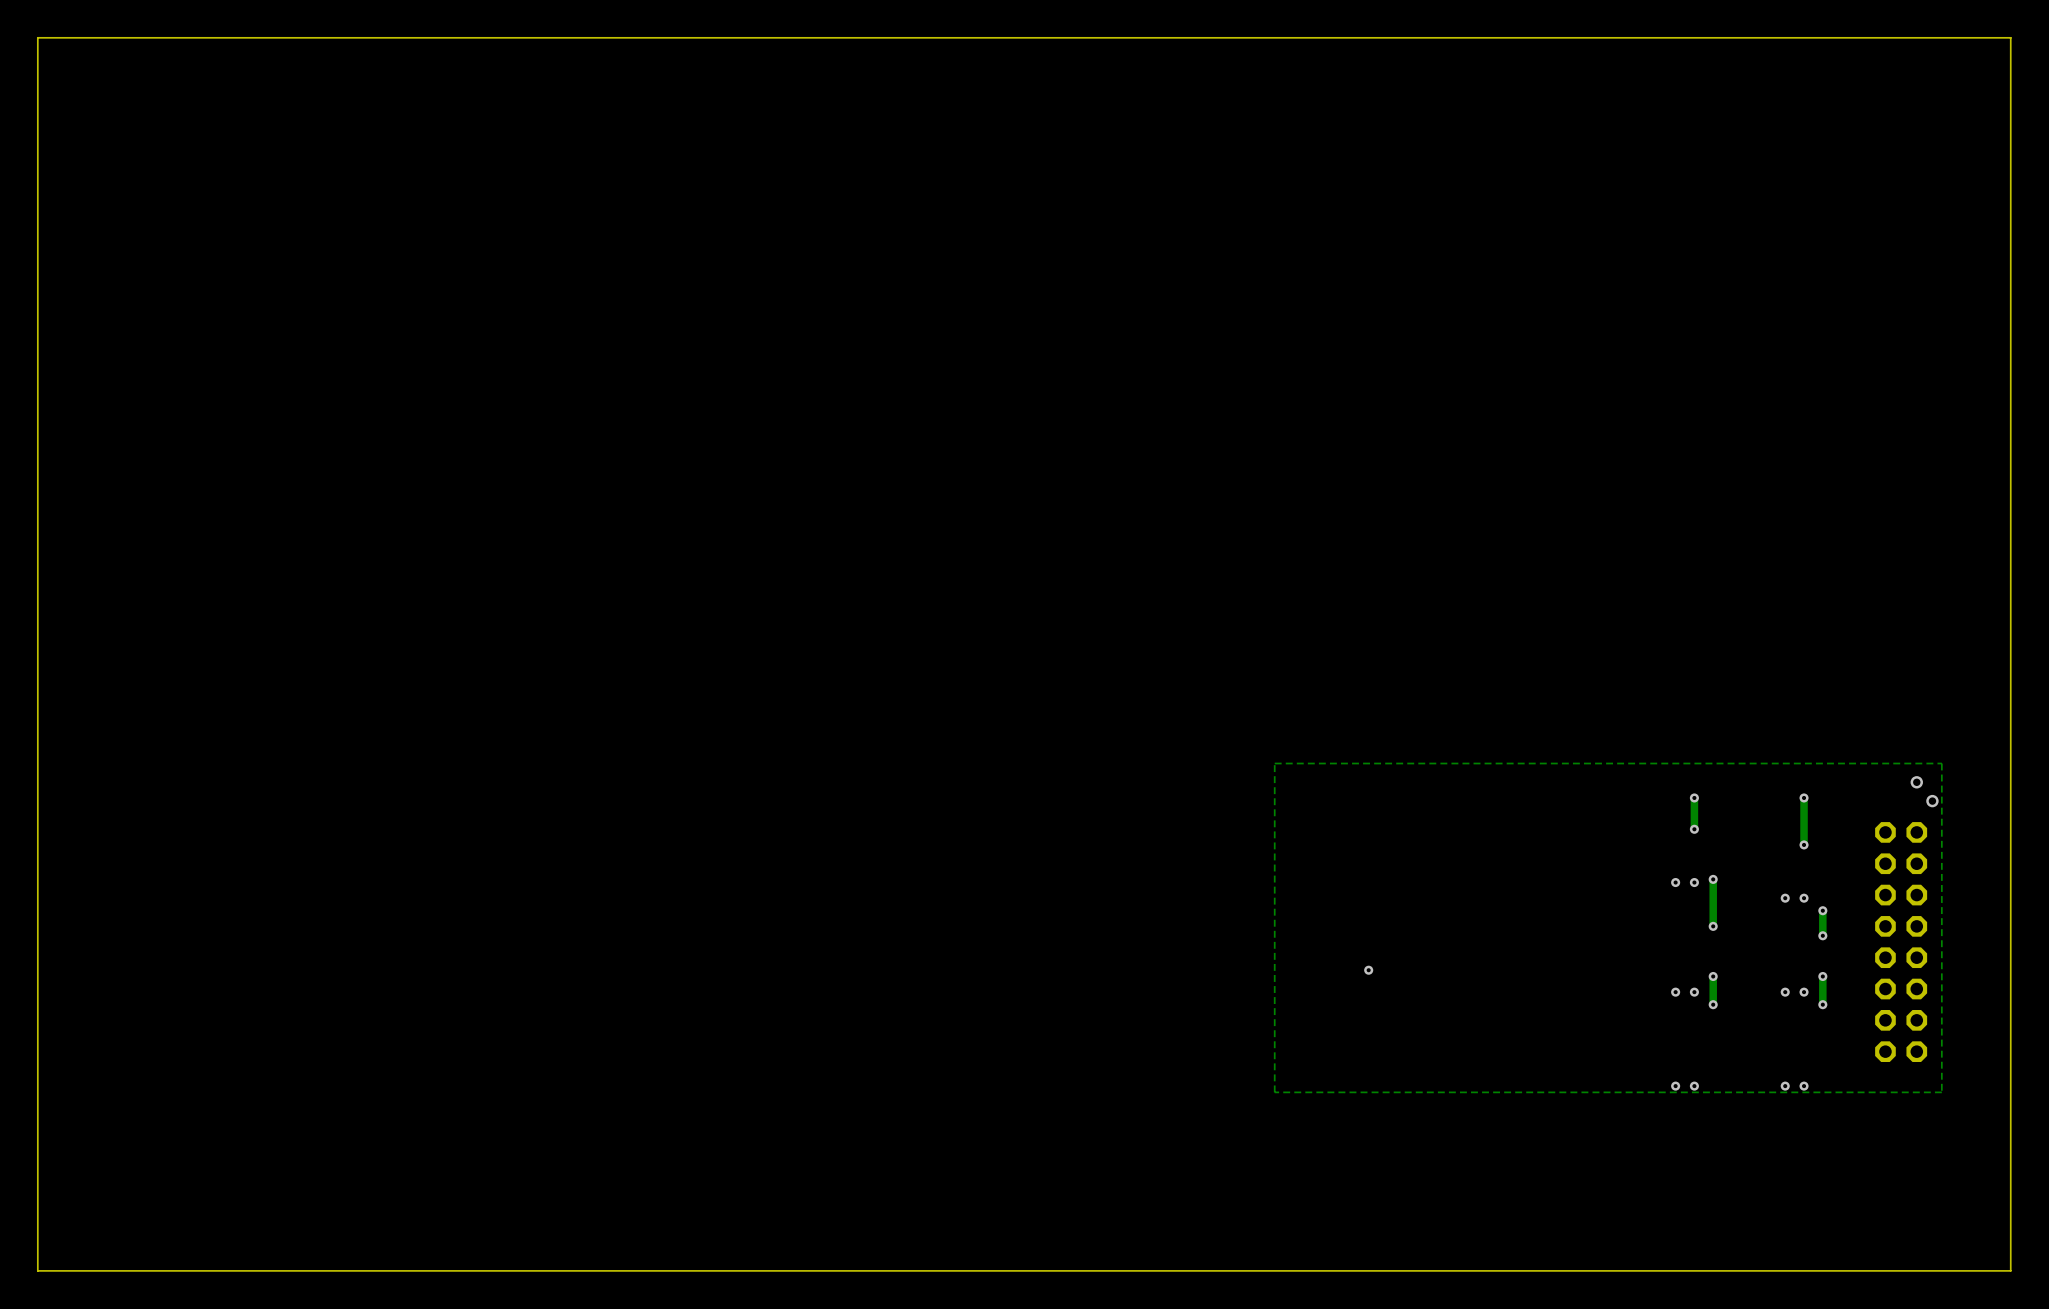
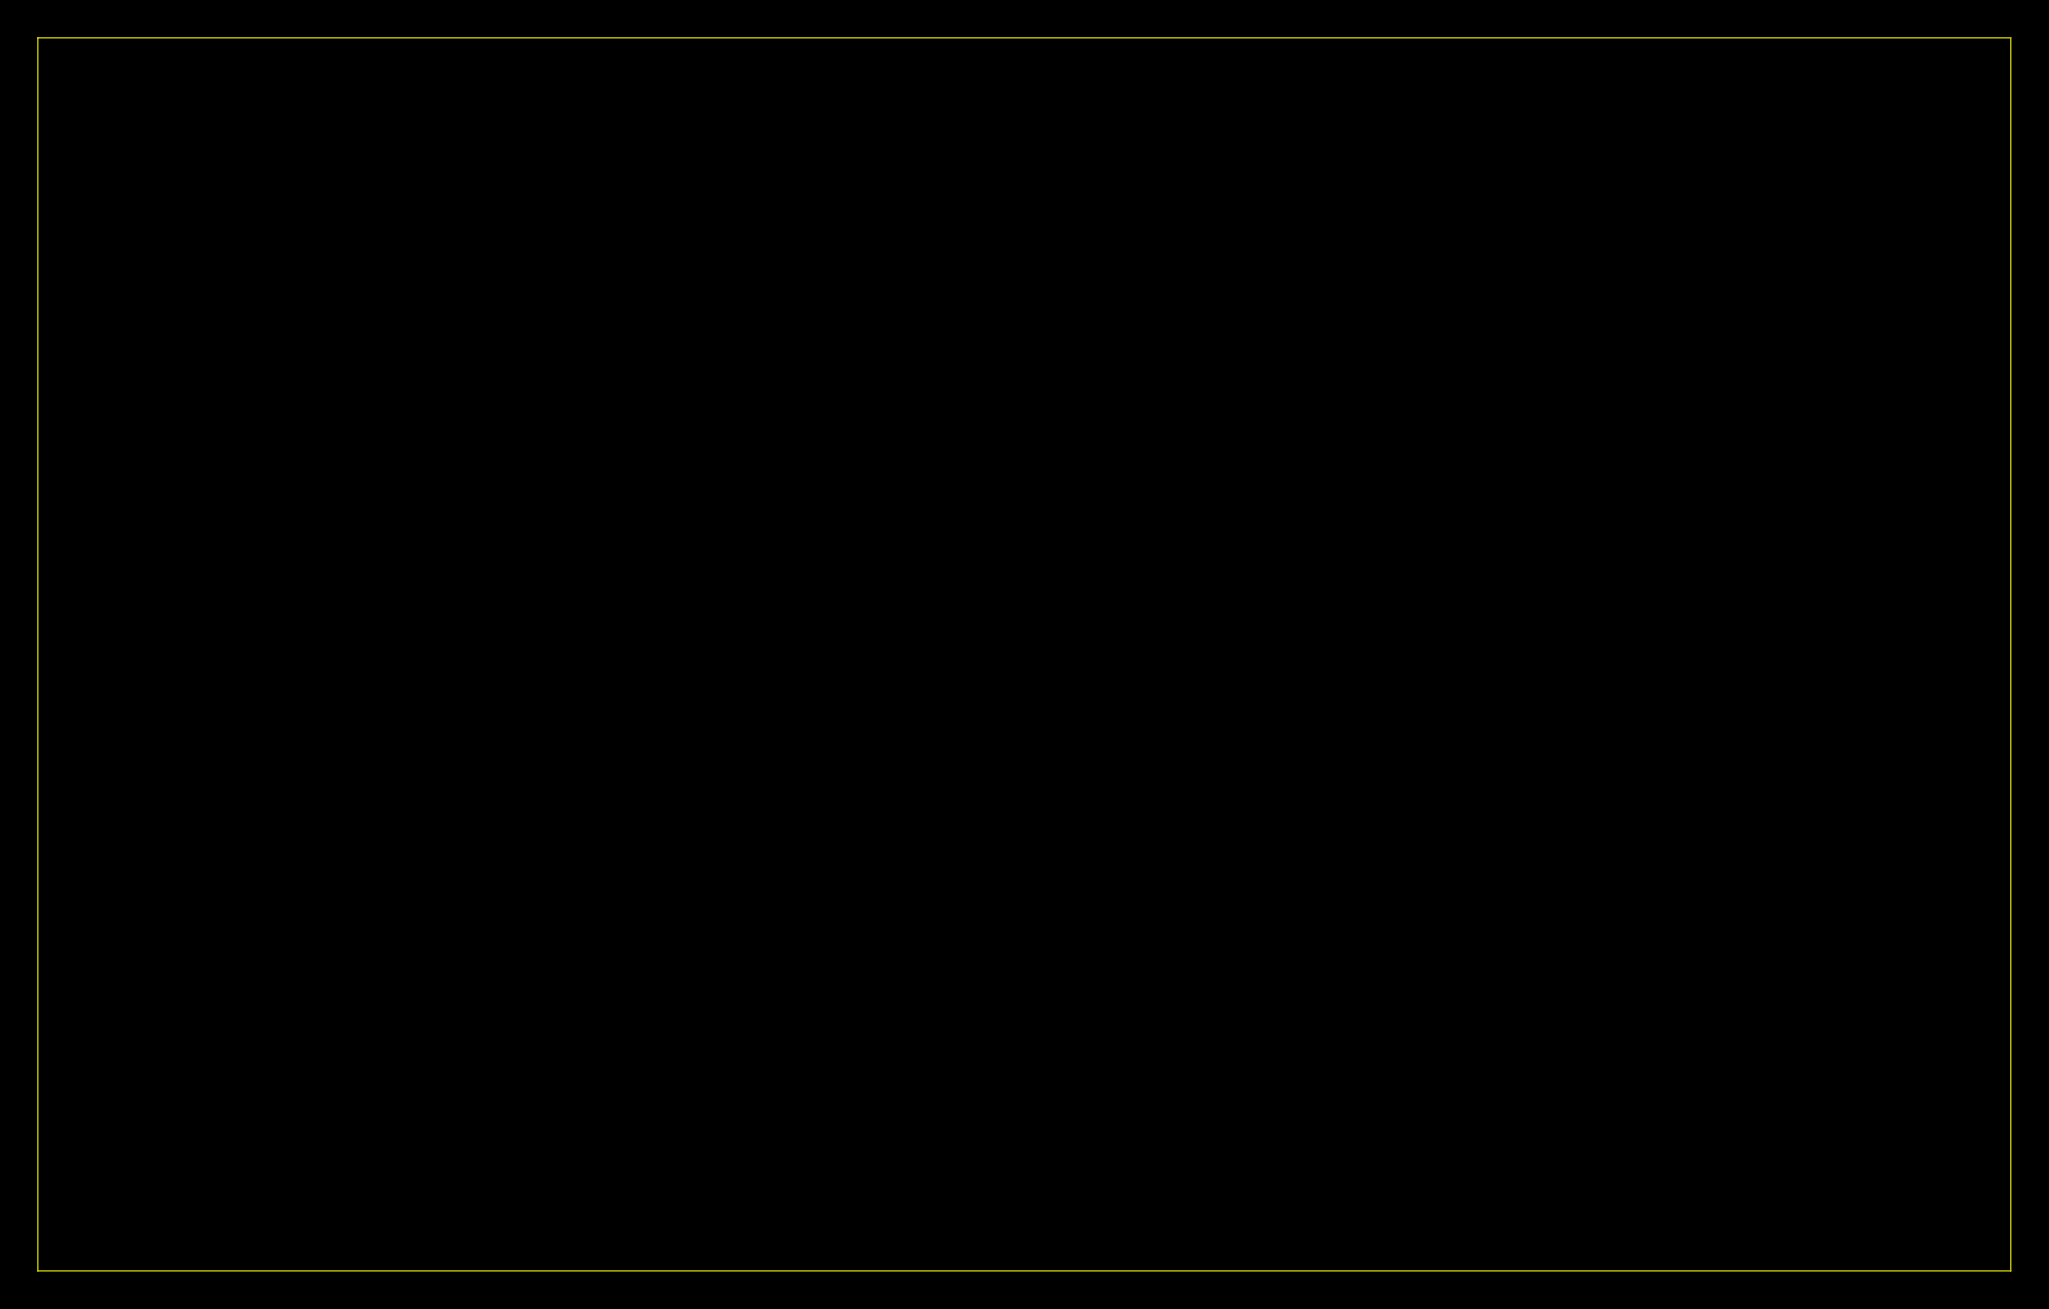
zone outline: (1941, 763) (1941, 1092) (1274, 1092) (1274, 763) (1941, 763) -> none
via: (1916, 782) -> none
track: (1694, 797) (1694, 829) -> none
via: (1694, 797) -> none
track: (1804, 797) (1804, 844) -> none
via: (1804, 797) -> none
via: (1932, 801) -> none
via: (1694, 829) -> none
via: (1804, 844) -> none
track: (1713, 879) (1713, 926) -> none
via: (1713, 879) -> none
via: (1675, 882) -> none
via: (1694, 882) -> none
via: (1785, 898) -> none
via: (1804, 898) -> none
track: (1822, 910) (1822, 935) -> none
via: (1822, 910) -> none
via: (1713, 926) -> none
via: (1822, 935) -> none
part: (1901, 942) -> none
via: (1368, 970) -> none
track: (1713, 976) (1713, 1004) -> none
via: (1713, 976) -> none
track: (1822, 976) (1822, 1004) -> none
via: (1822, 976) -> none
via: (1675, 992) -> none
via: (1694, 992) -> none
via: (1785, 992) -> none
via: (1804, 992) -> none
via: (1713, 1004) -> none
via: (1822, 1004) -> none
via: (1675, 1086) -> none
via: (1694, 1086) -> none
via: (1785, 1086) -> none
via: (1804, 1086) -> none

